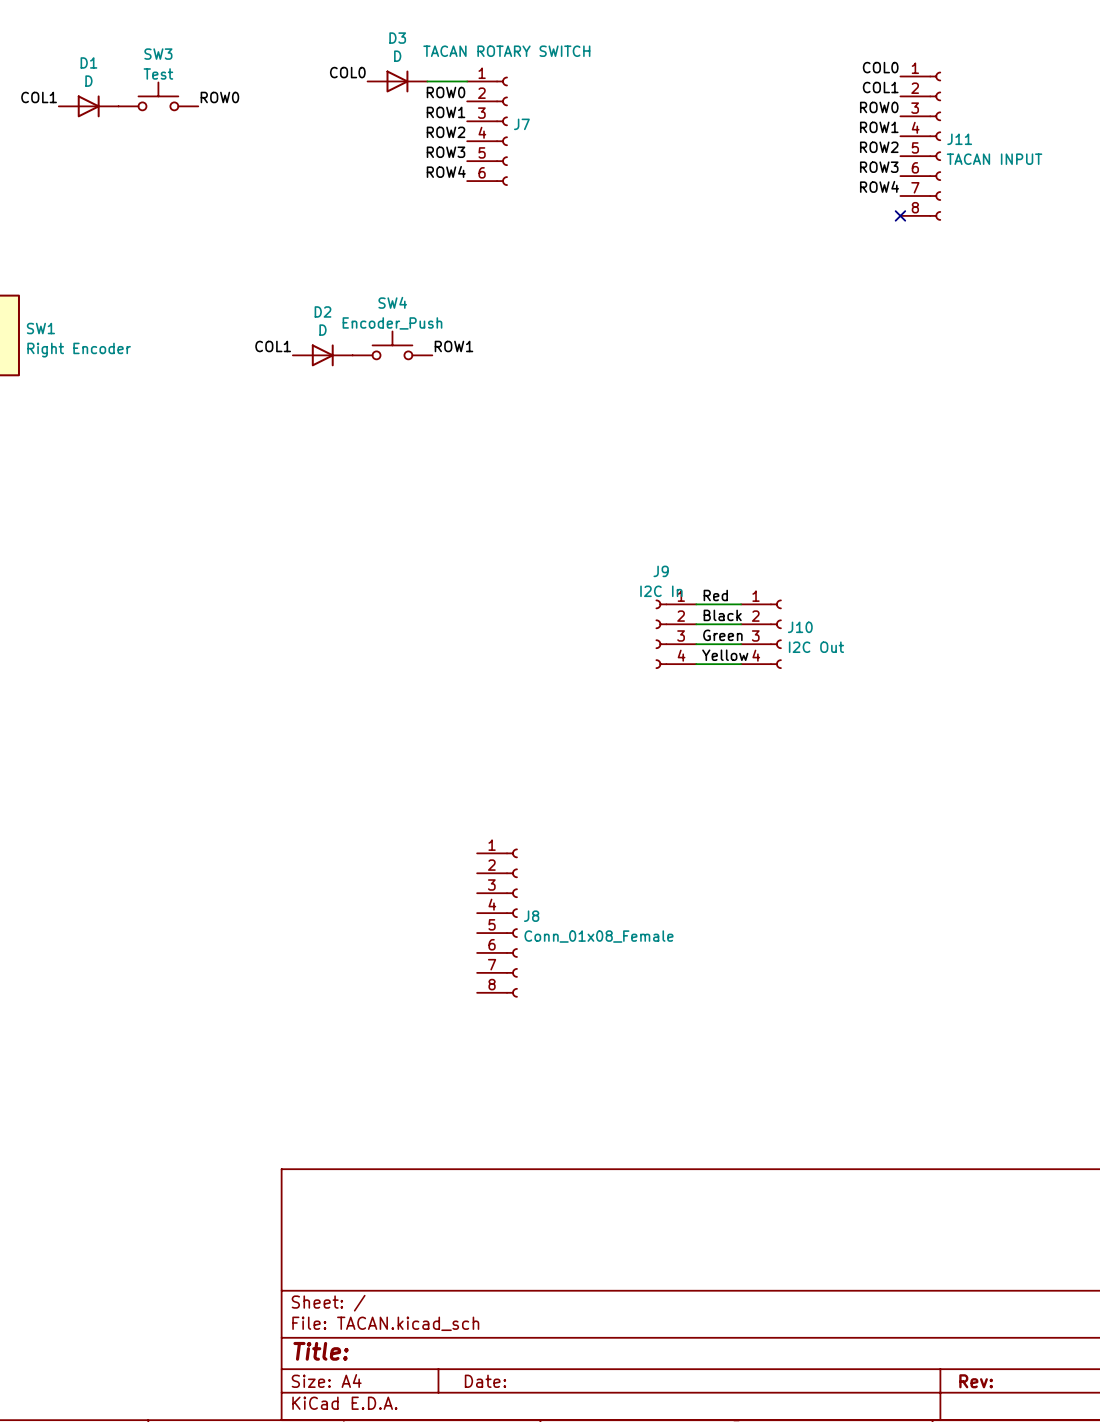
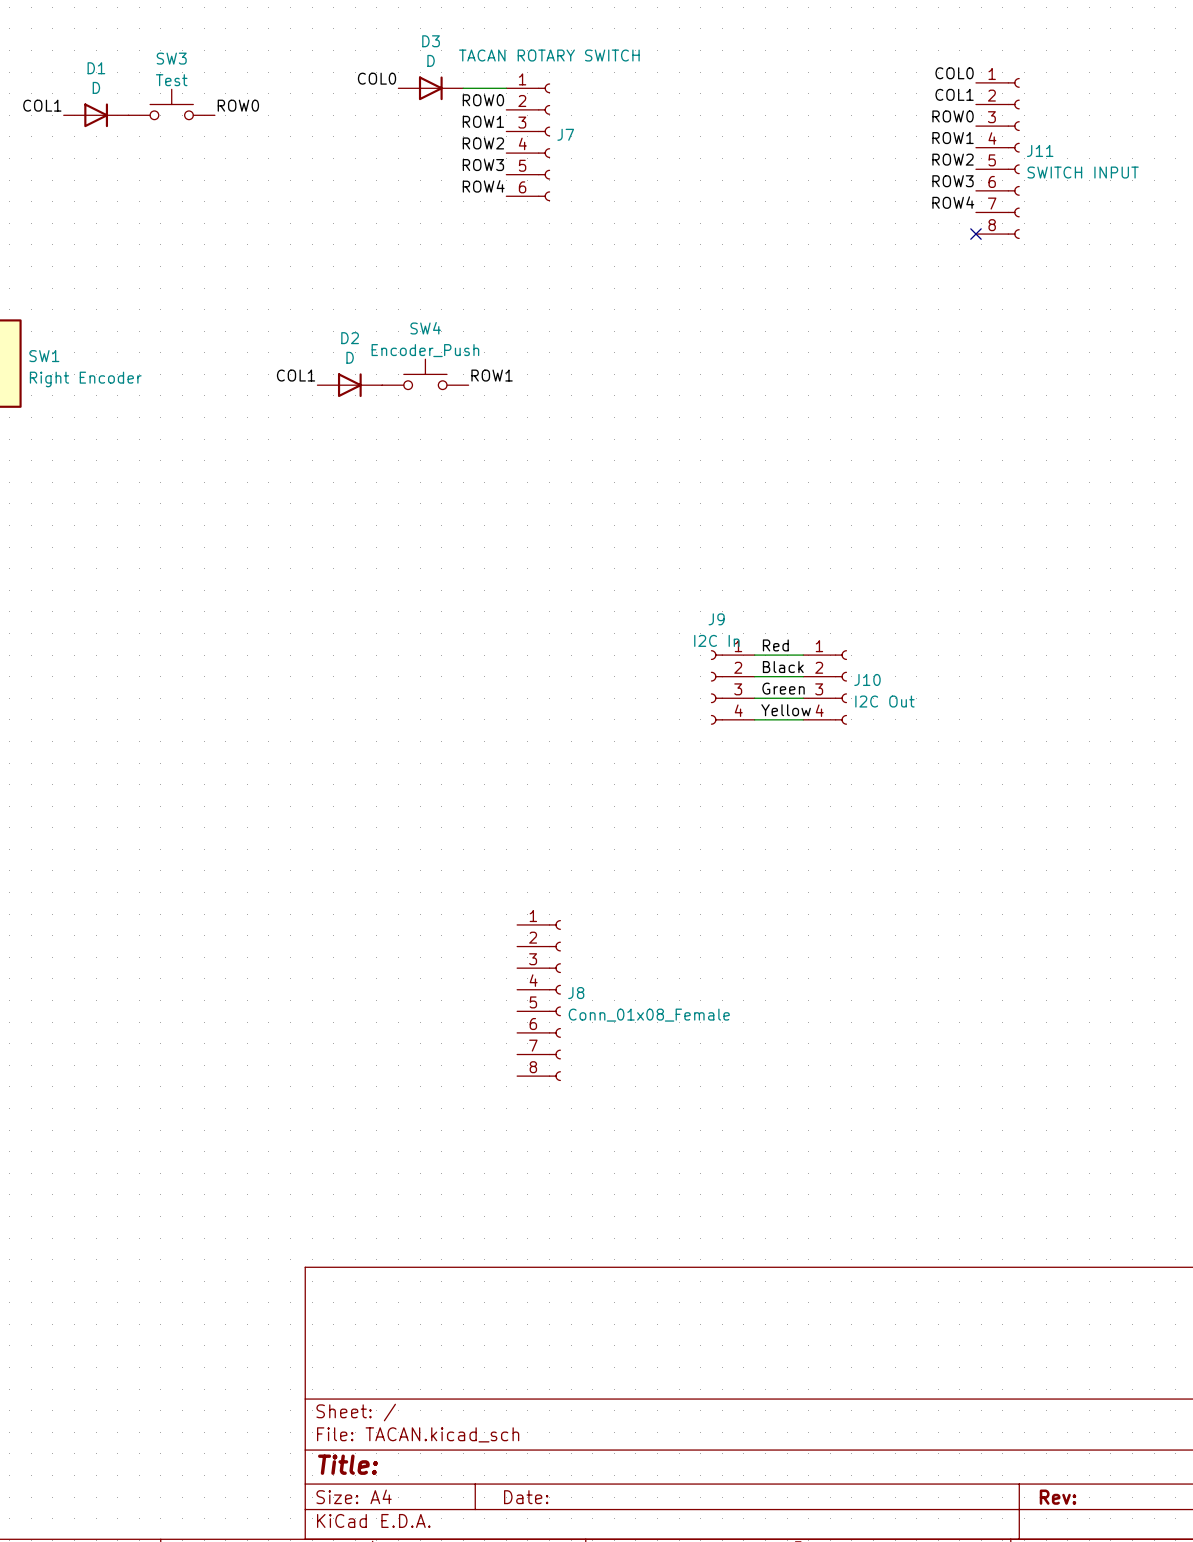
J11 value: TACAN INPUT (994, 159) -> SWITCH INPUT (1083, 172)

